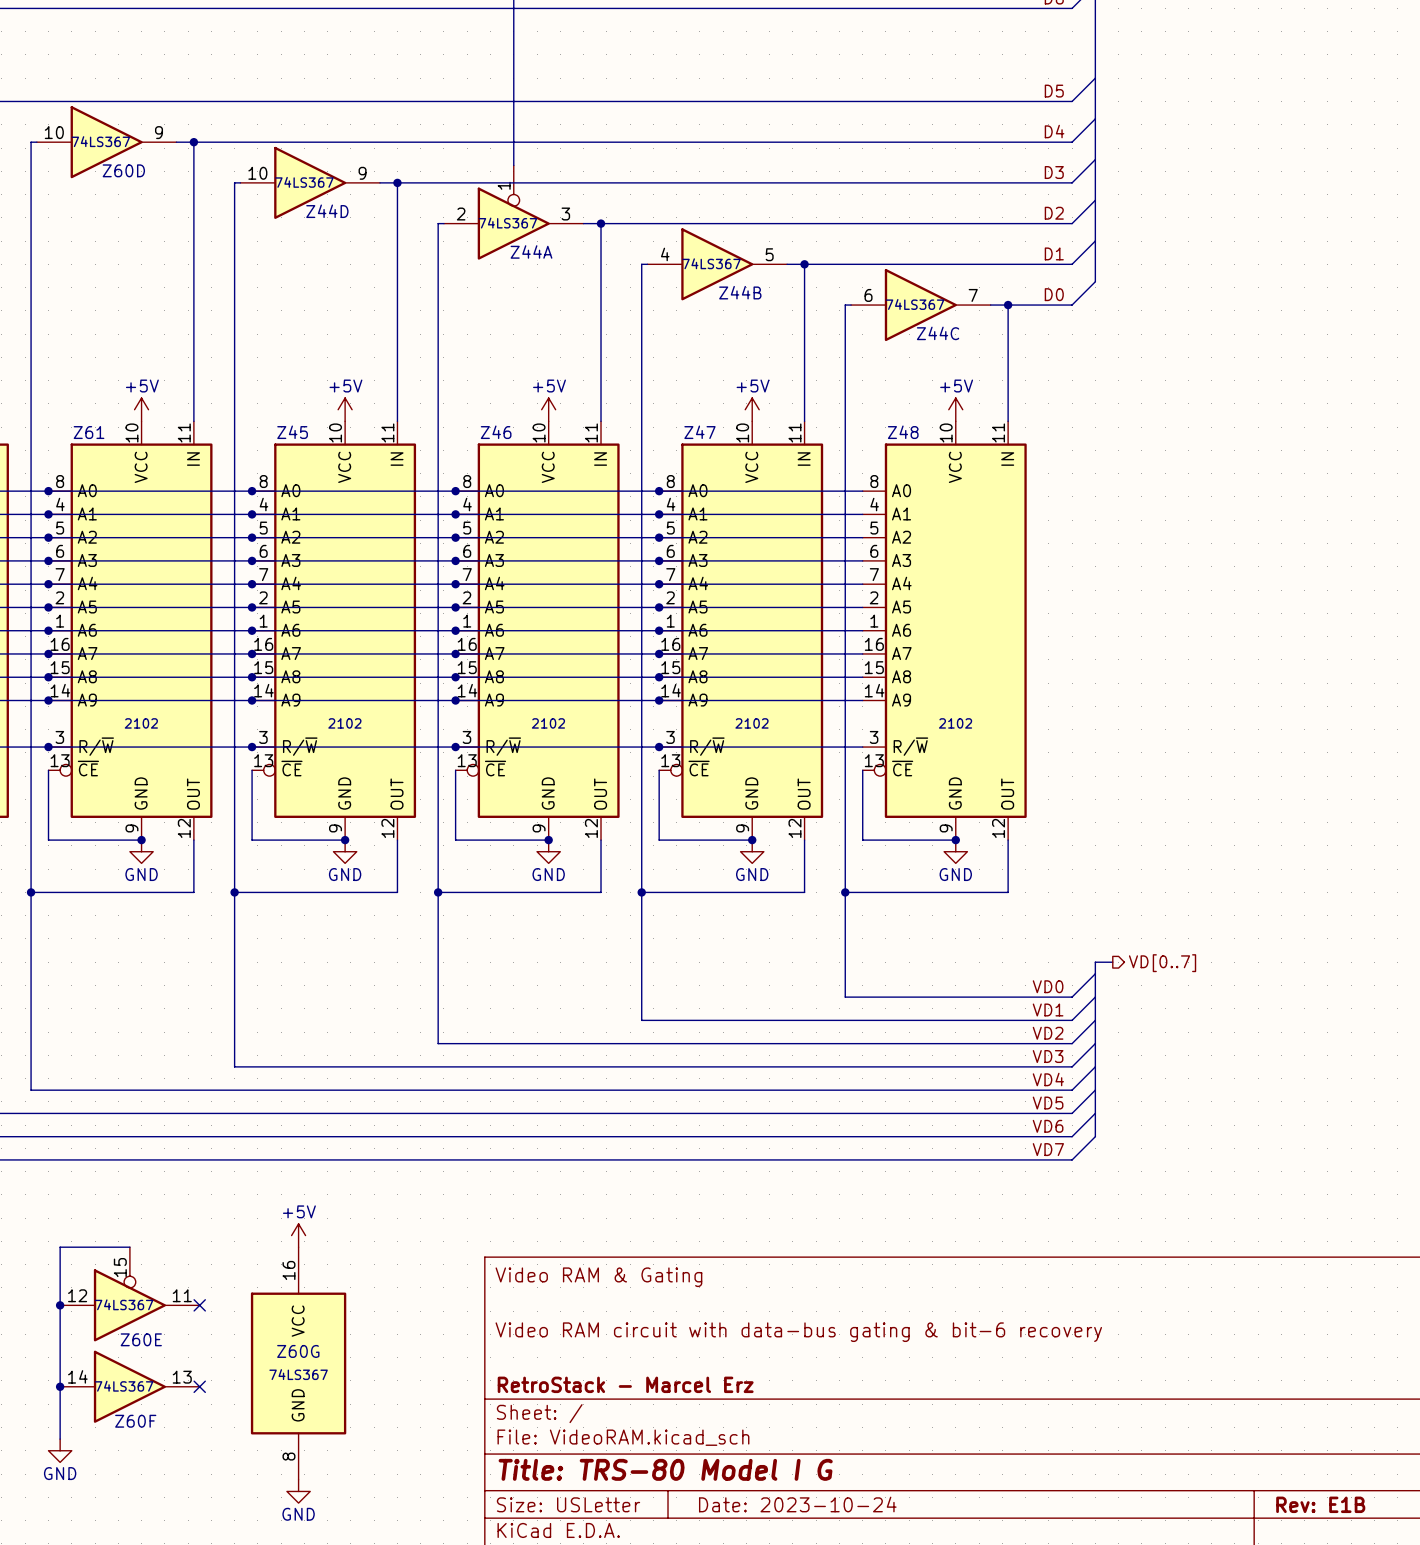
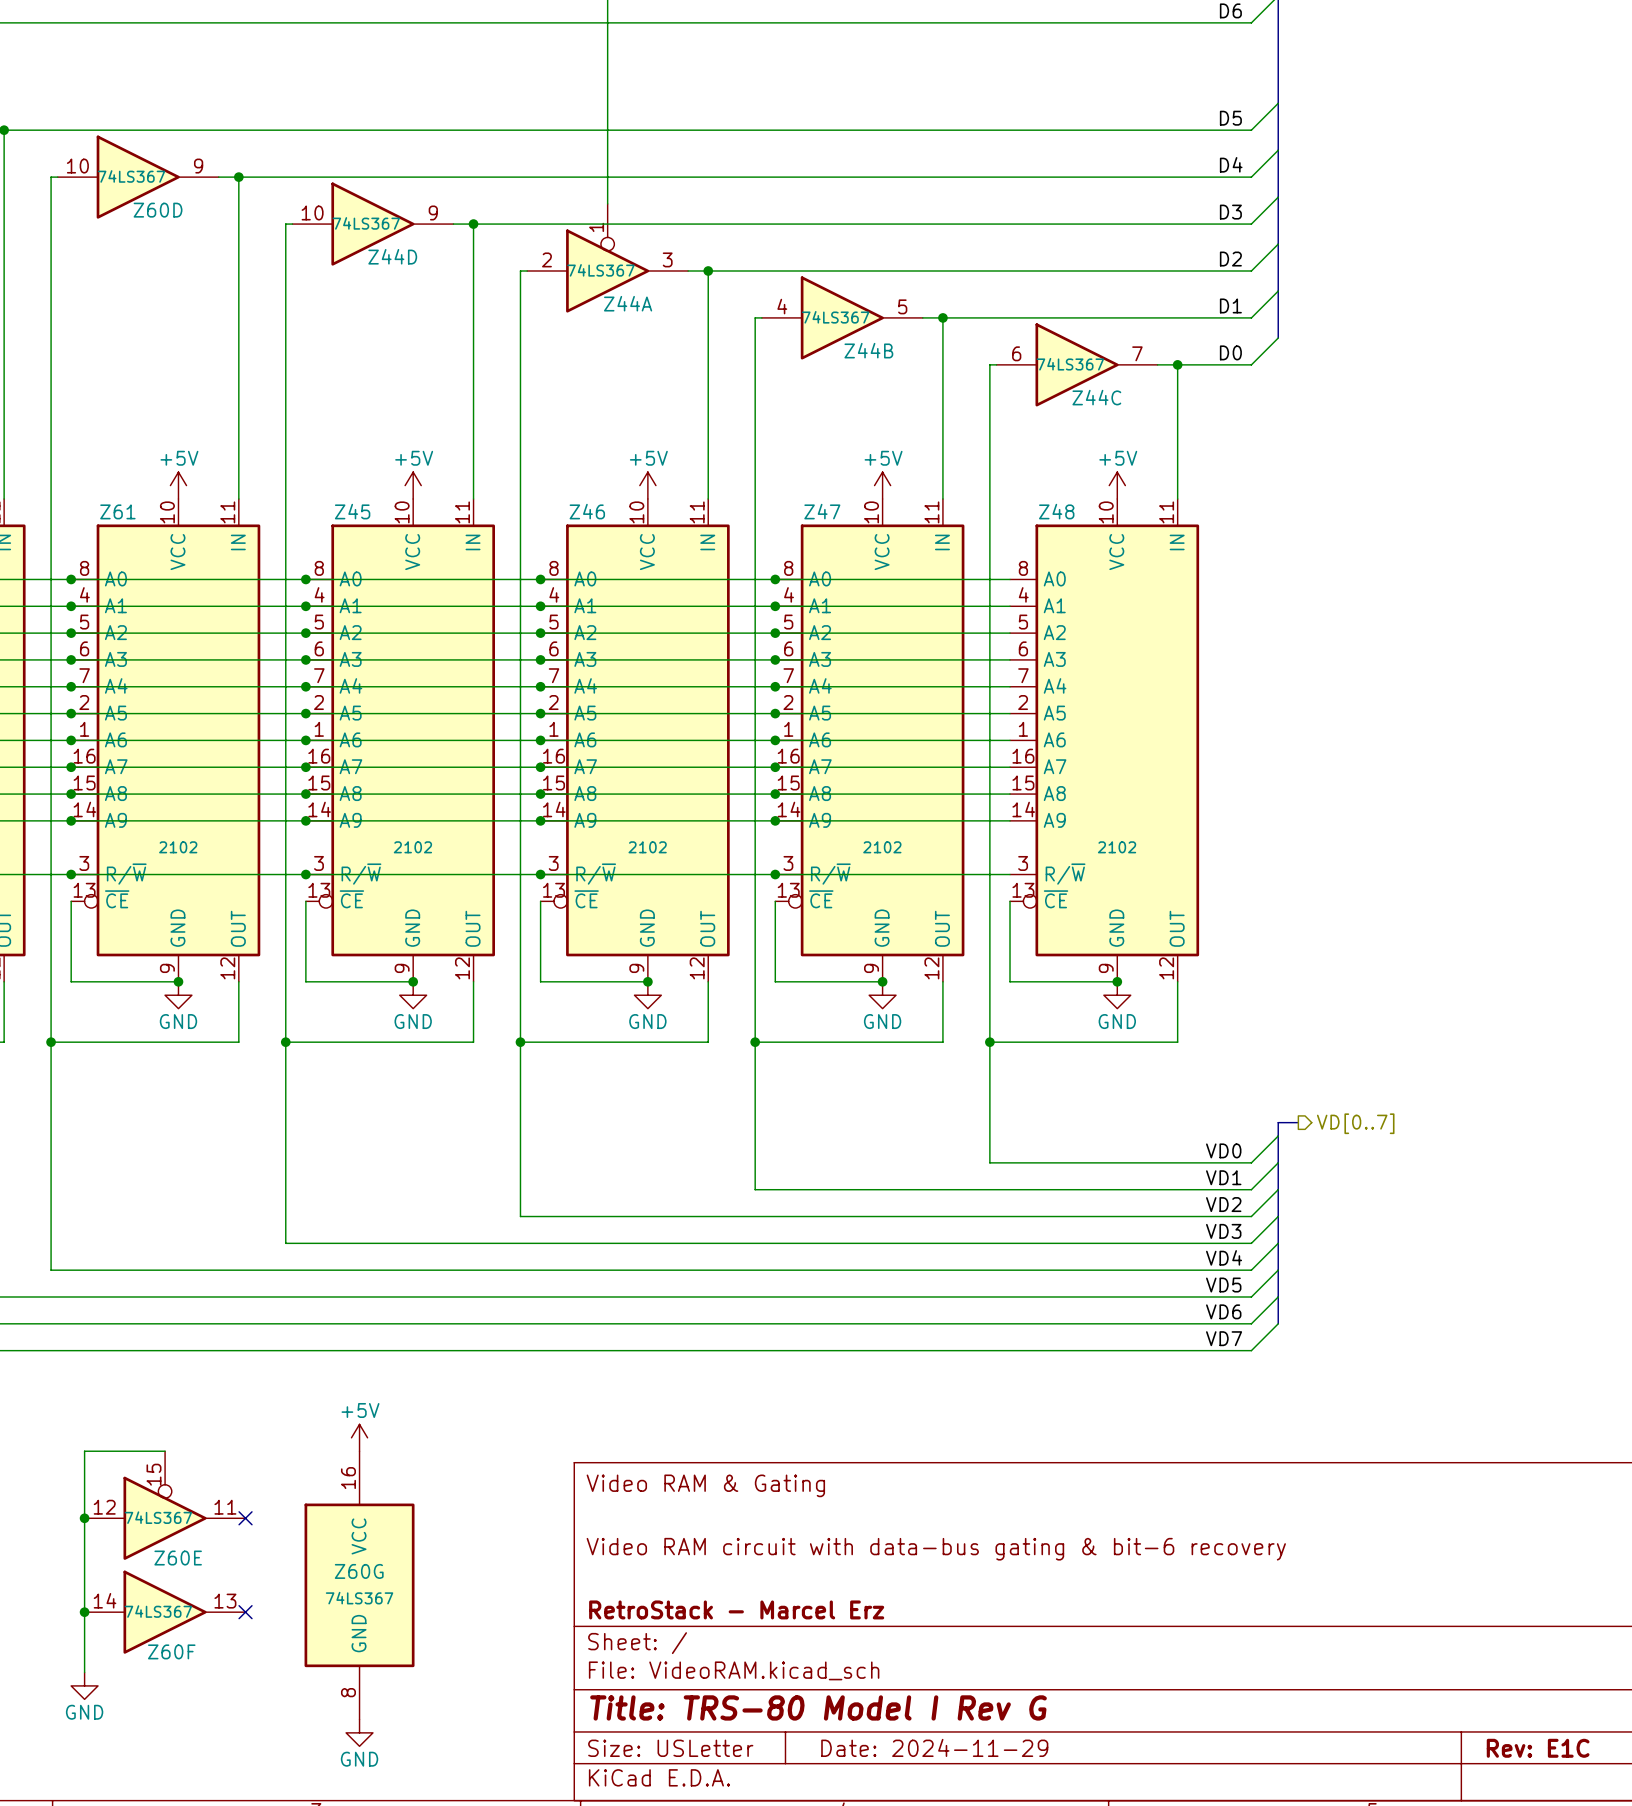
title block: Title: TRS-80 Model I G (665, 1469) -> Title: TRS-80 Model I Rev G (818, 1707)
title block: Date: 2023-10-24 (797, 1504) -> Date: 2024-11-29 (934, 1747)
title block: Rev: E1B (1320, 1504) -> Rev: E1C (1538, 1748)

